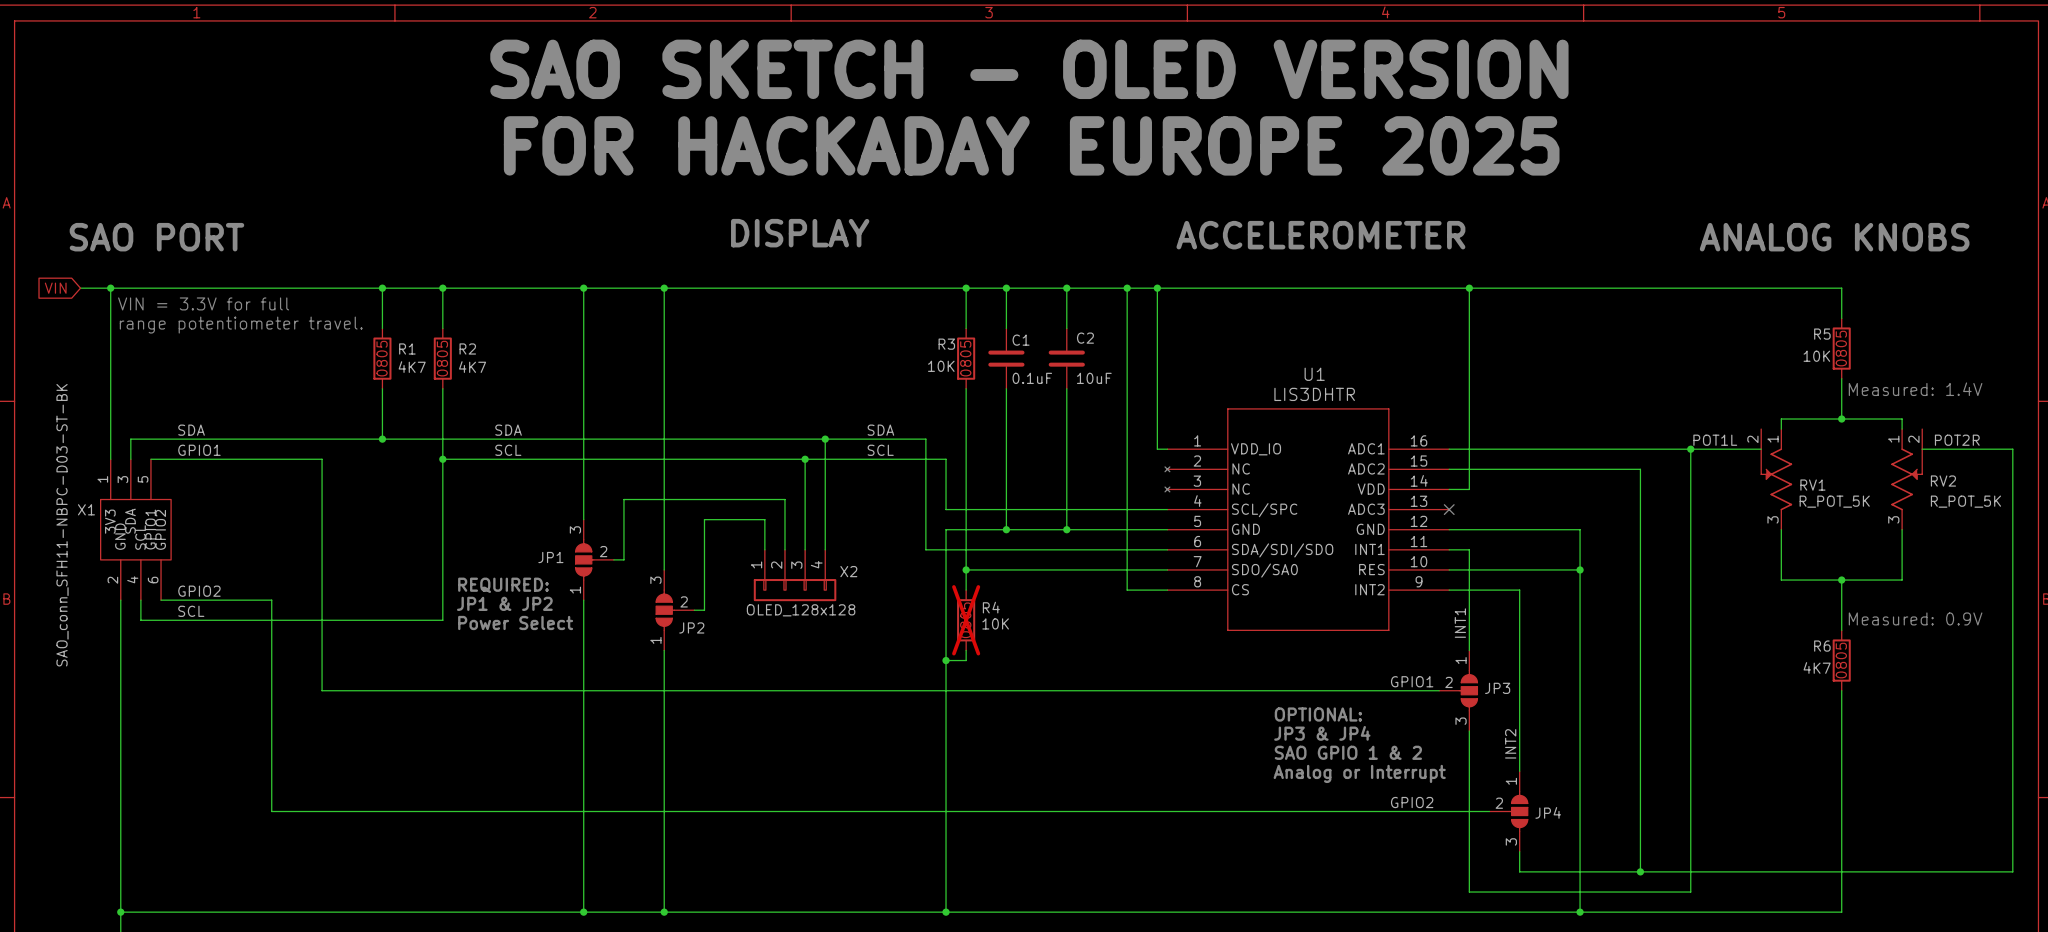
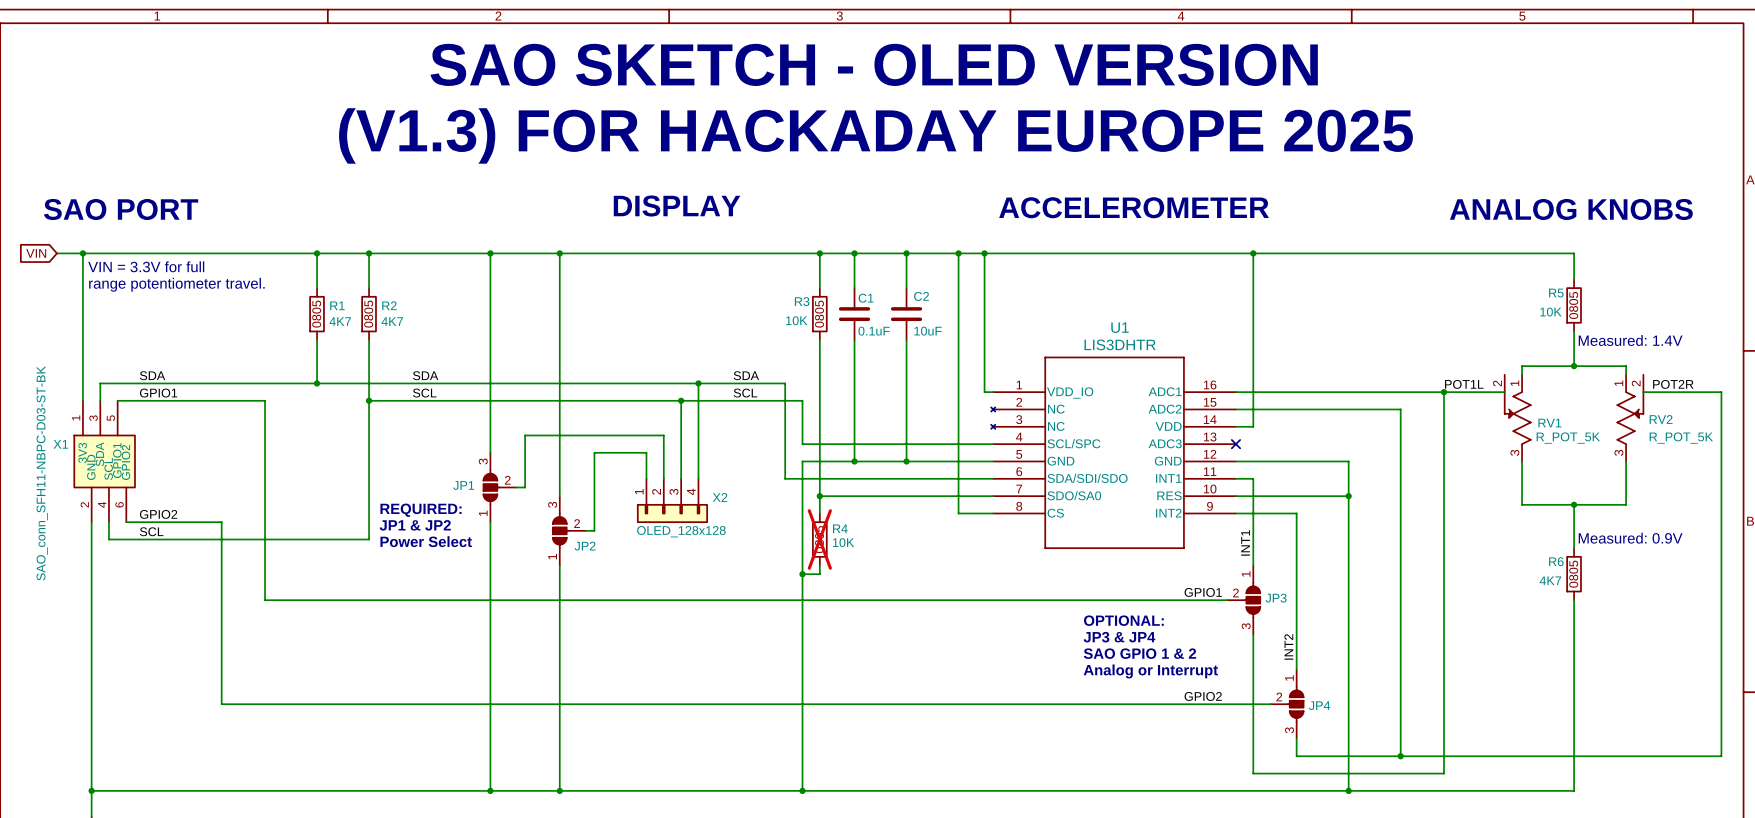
text: FOR HACKADAY EUROPE 2025 (1031, 145) -> (V1.3) FOR HACKADAY EUROPE 2025 (875, 135)

